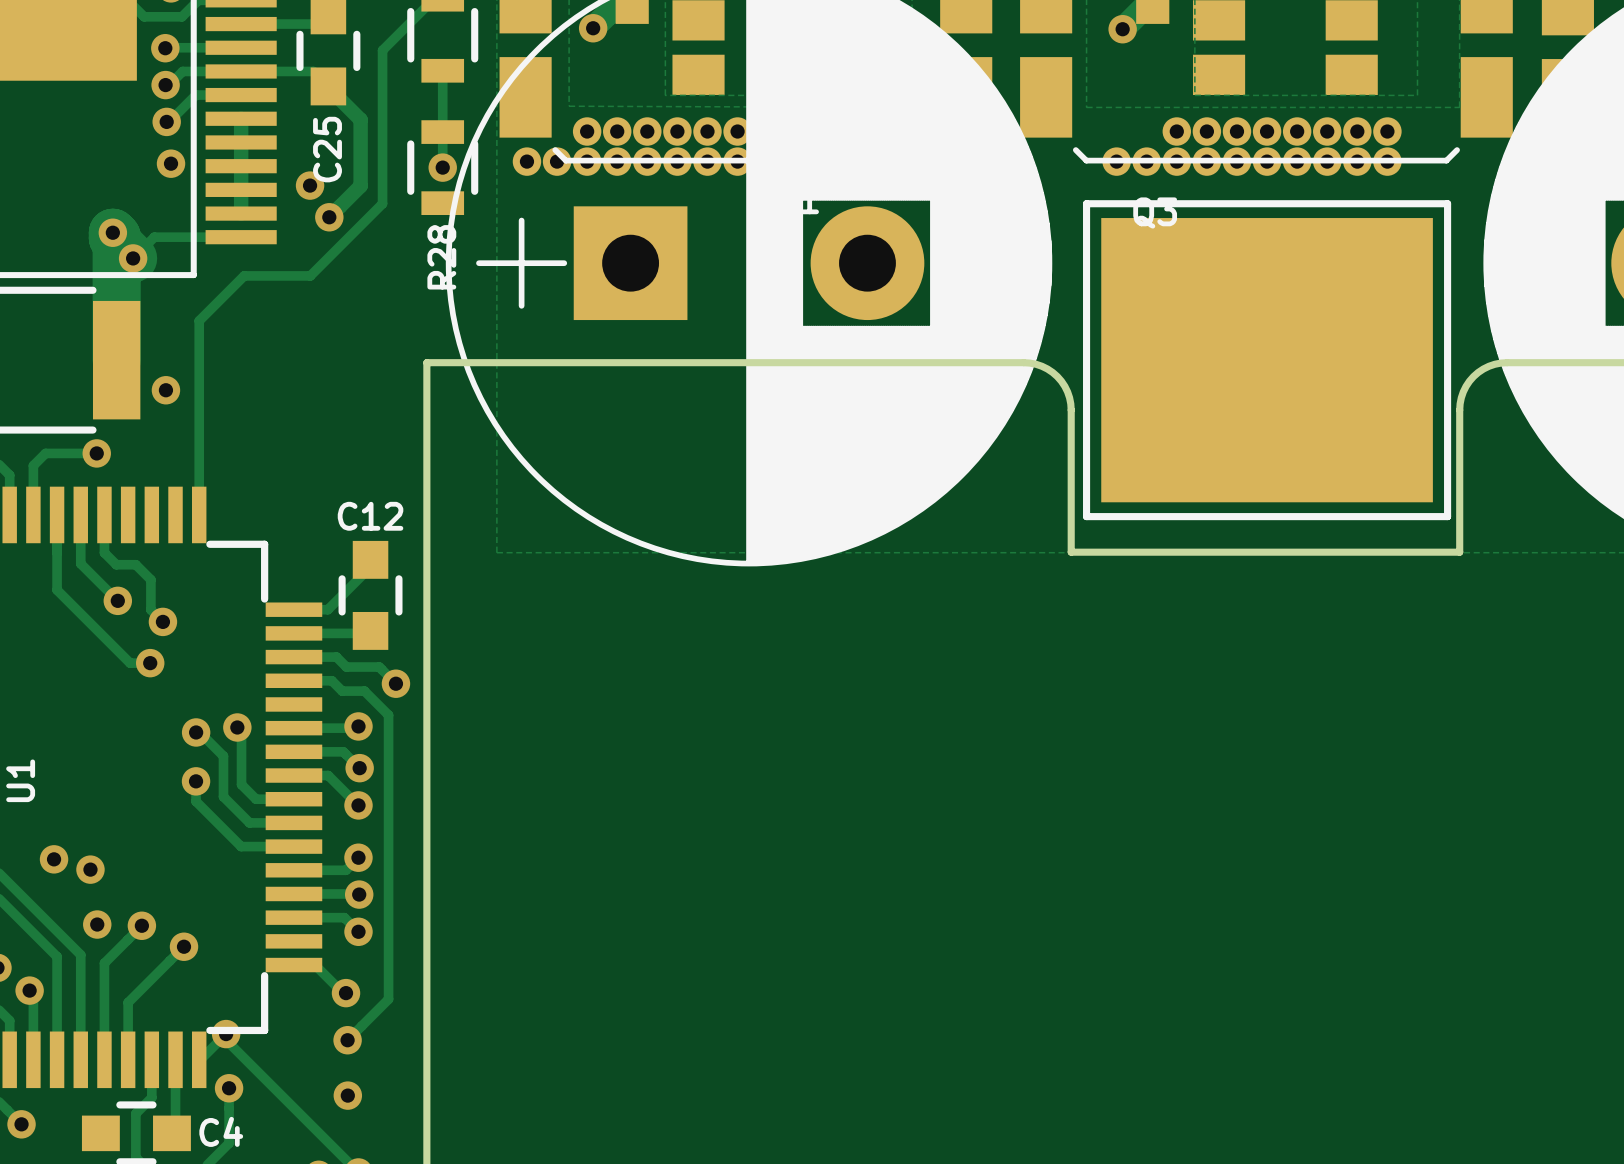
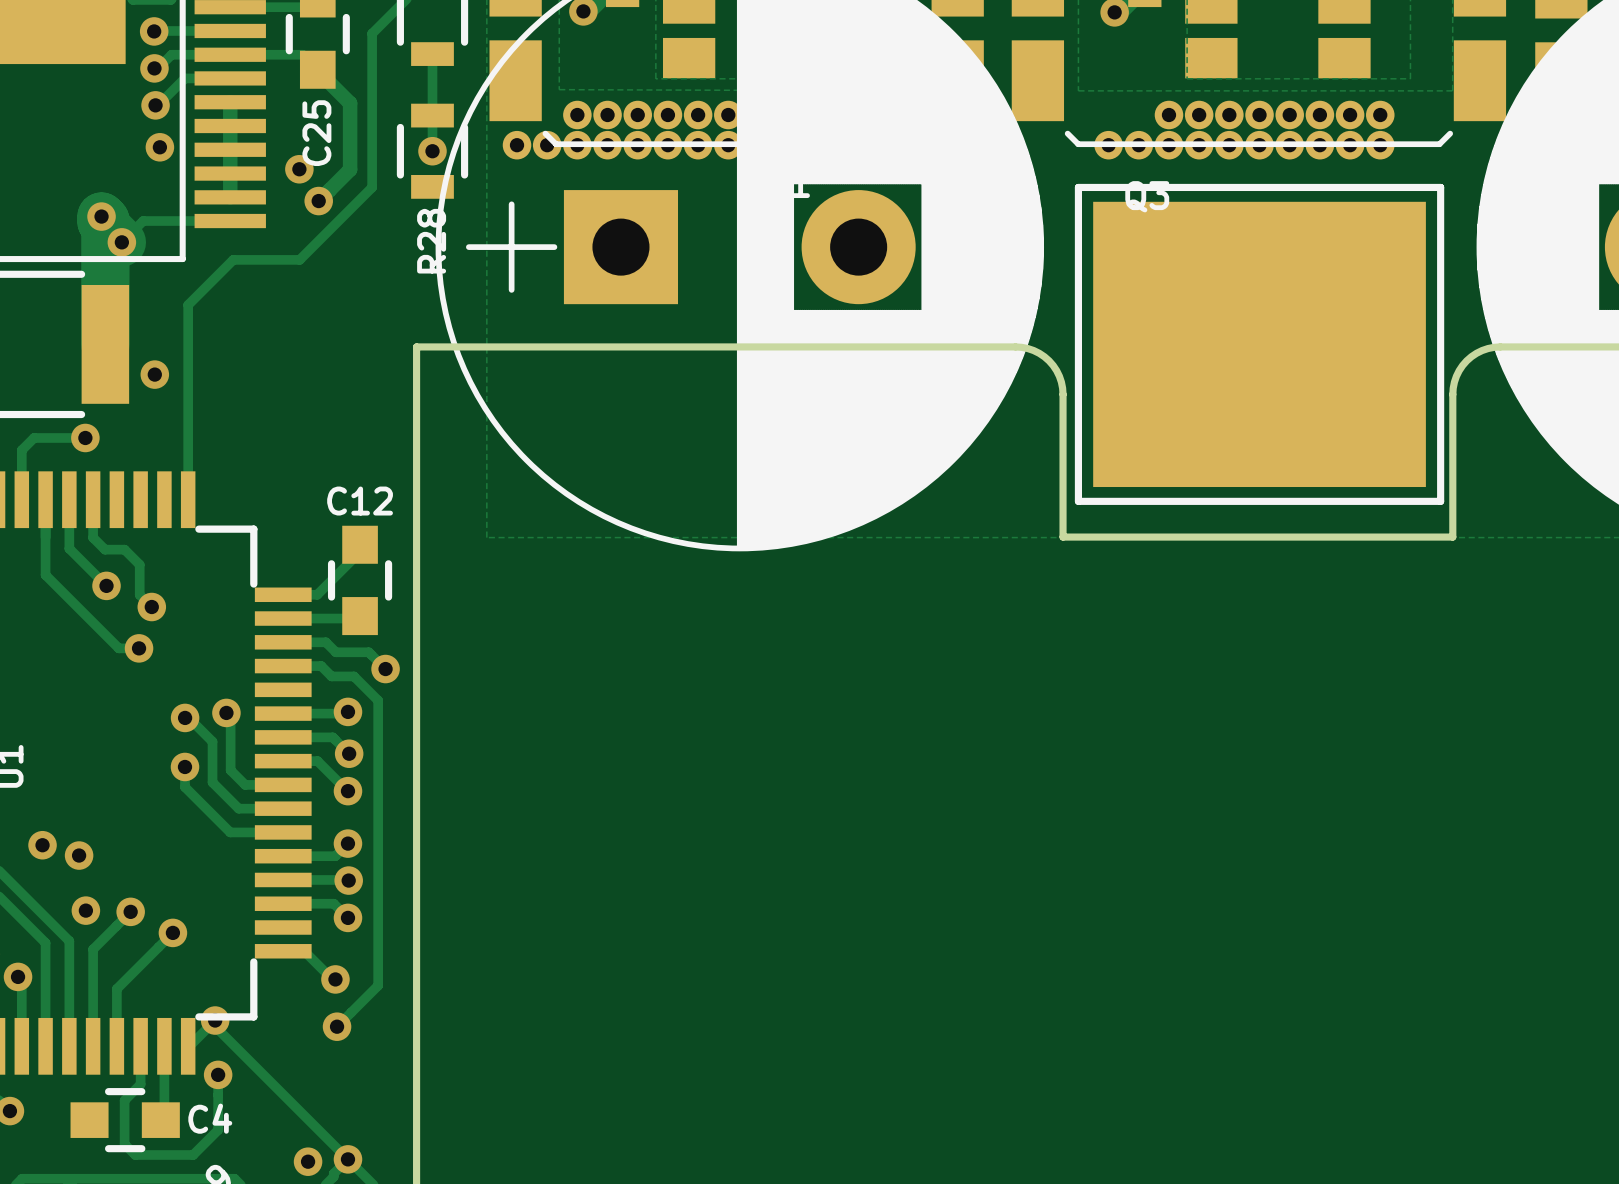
via: (347, 1095) -> none

